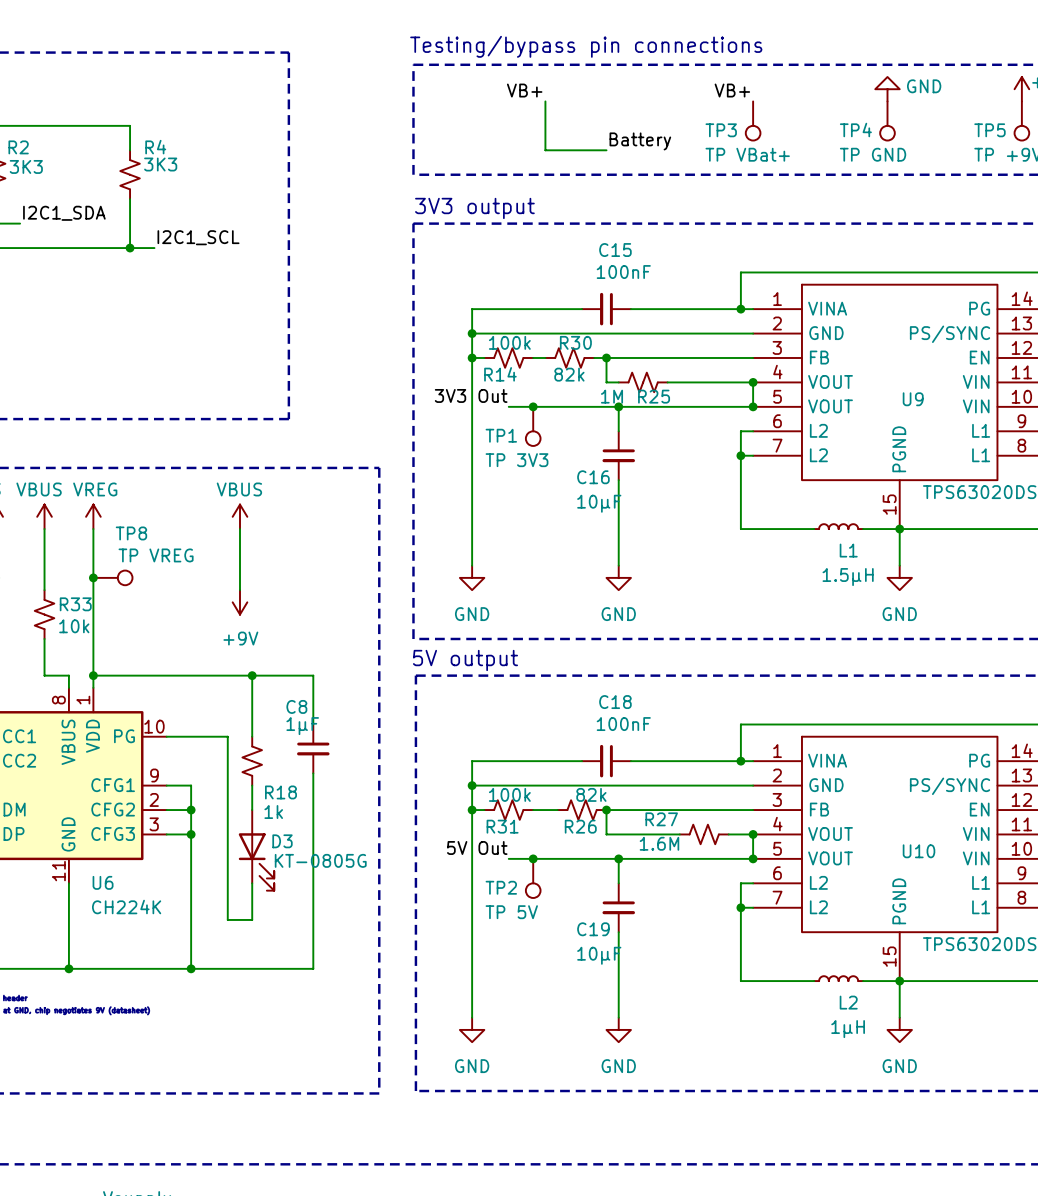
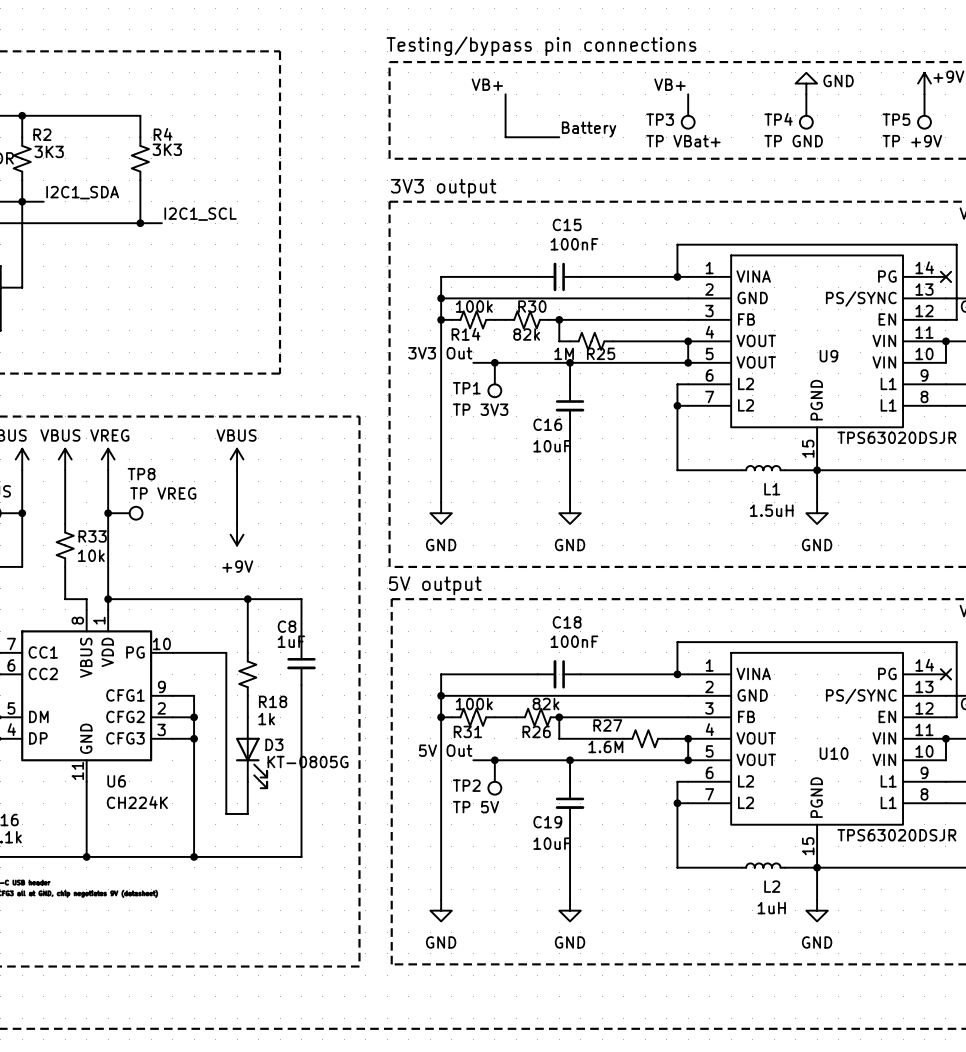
C16 value: 10μF (599, 503) -> 10uF (552, 446)
L1 value: 1.5μH (848, 577) -> 1.5uH (771, 510)
C8 value: 1μF (302, 726) -> 1uF (291, 641)
C19 value: 10μF (599, 955) -> 10uF (552, 843)
L2 value: 1μH (848, 1029) -> 1uH (771, 908)

